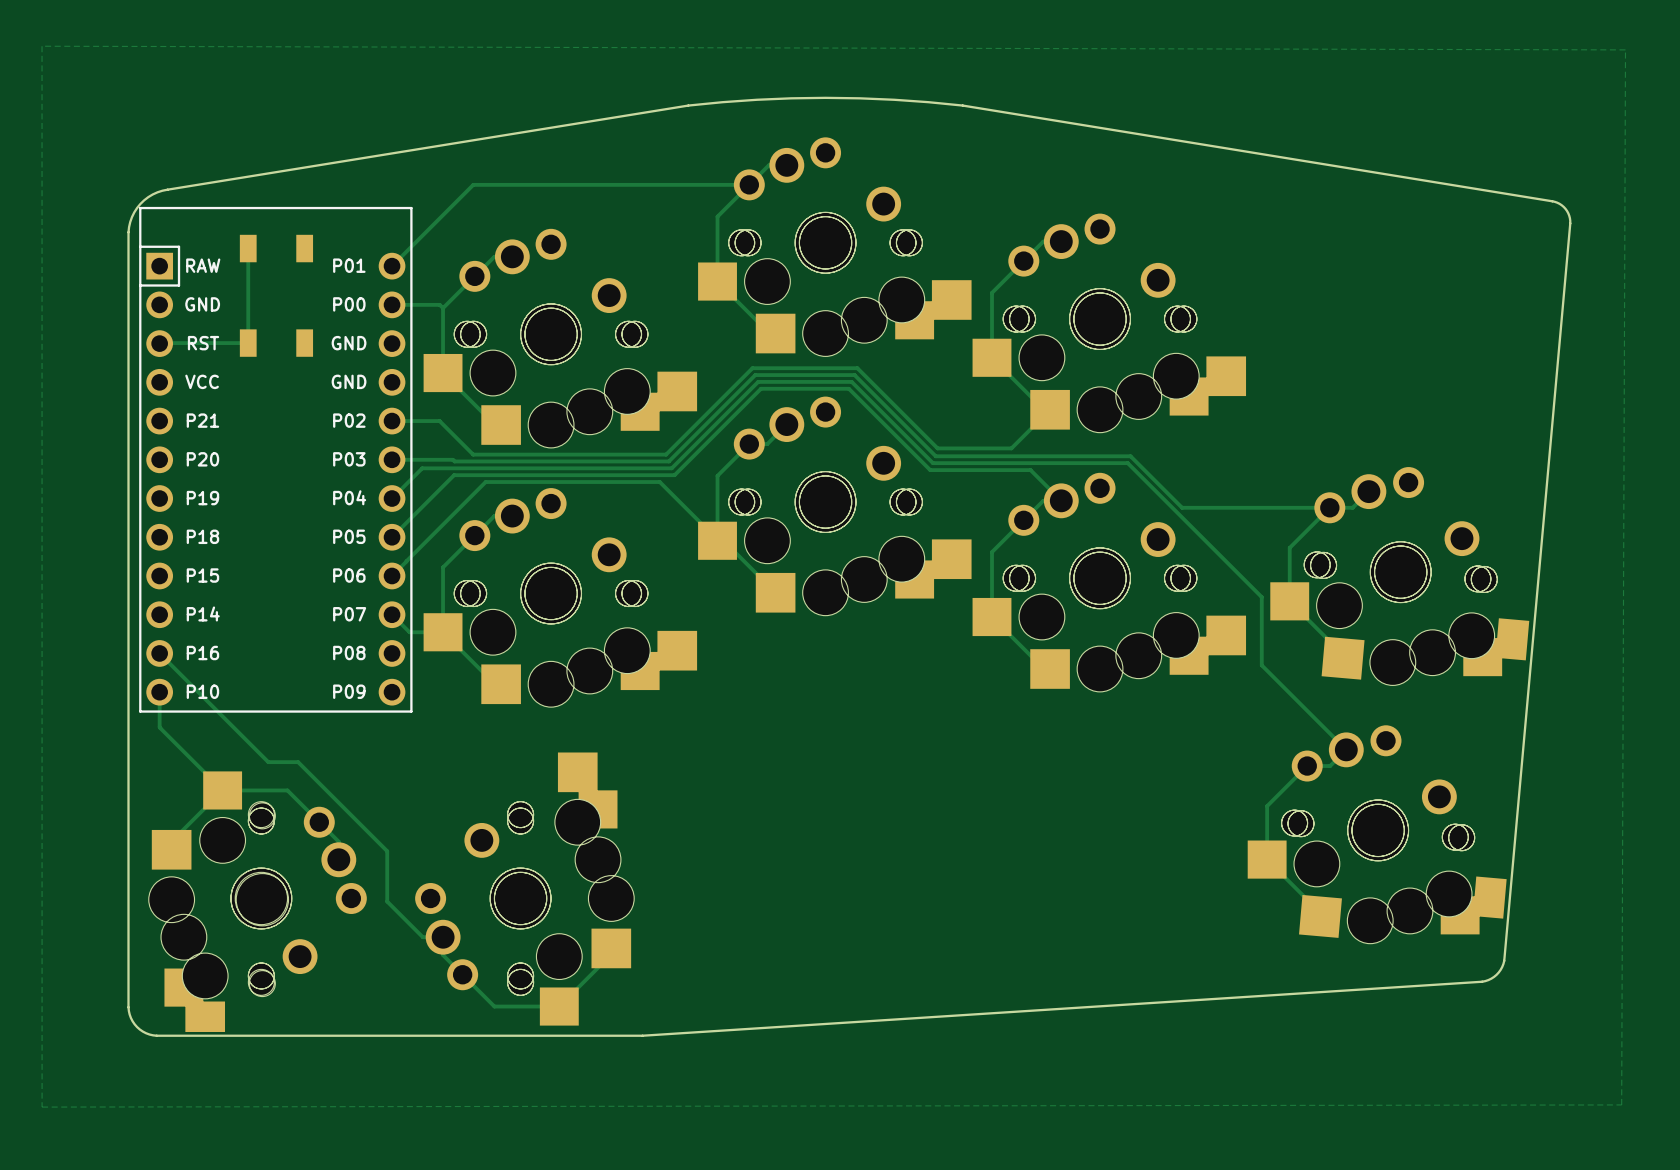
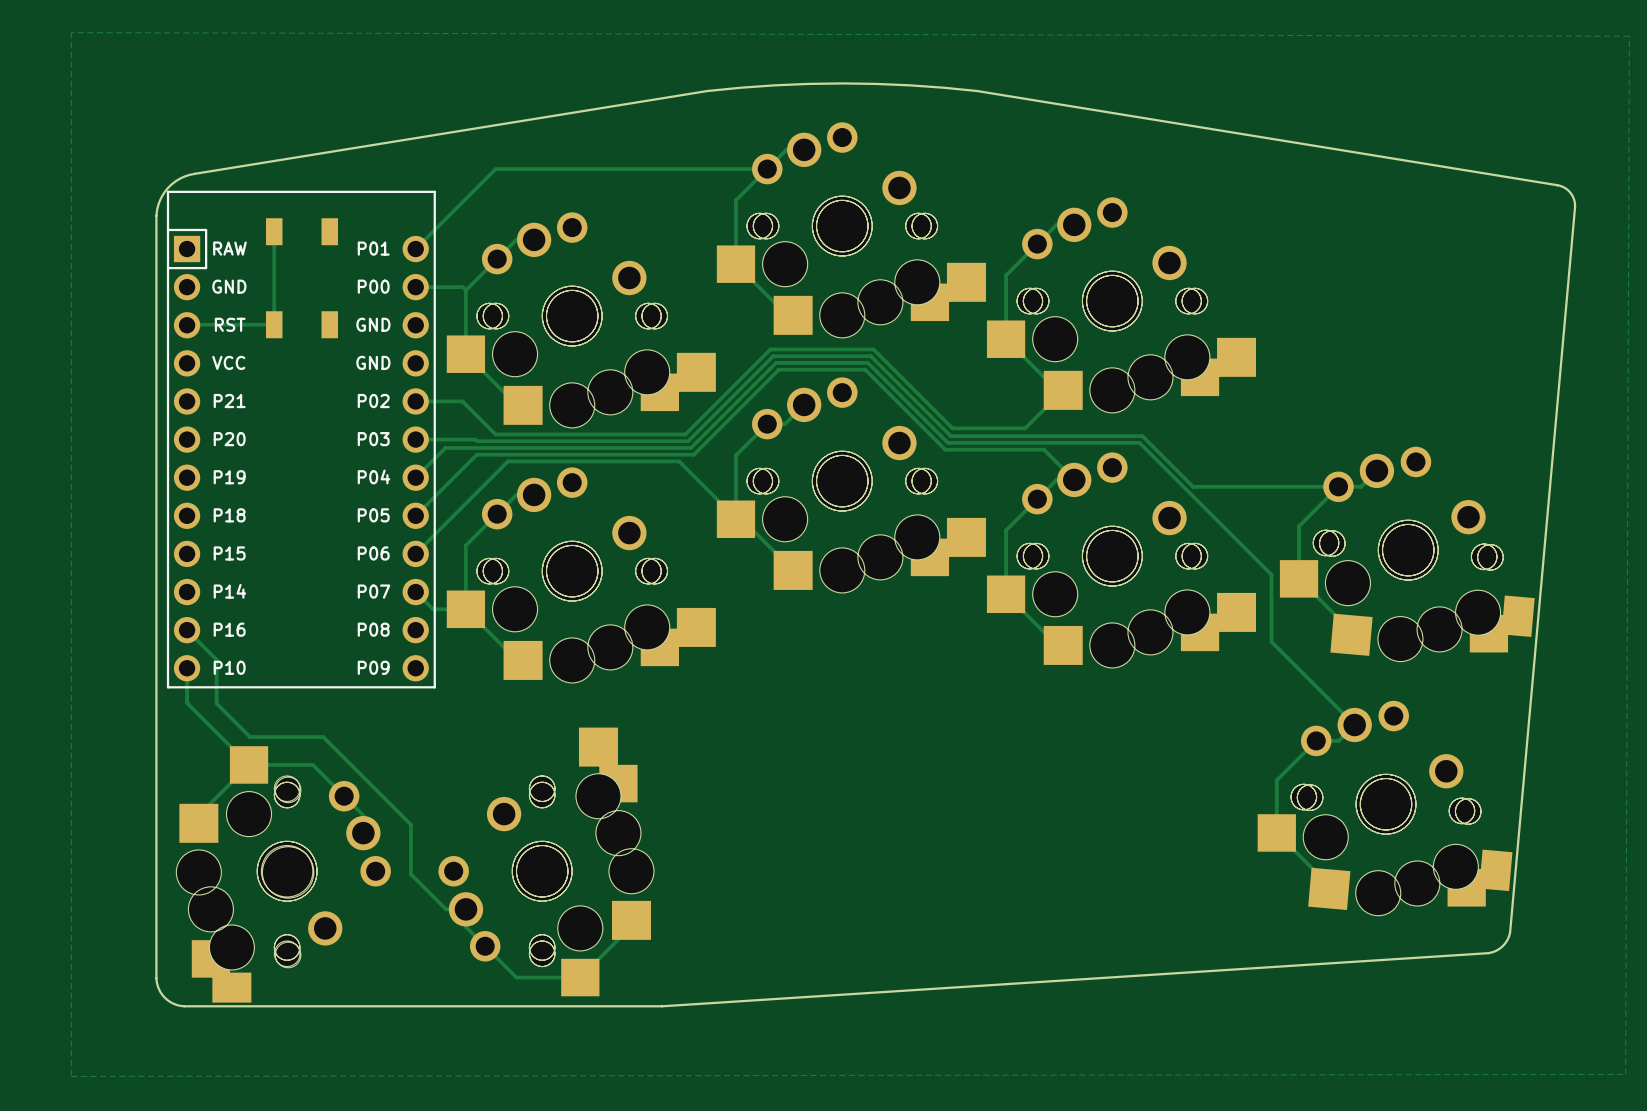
track: (189, 683) (268, 762) -> (216, 659) (216, 703) (250, 737) (294, 737)

